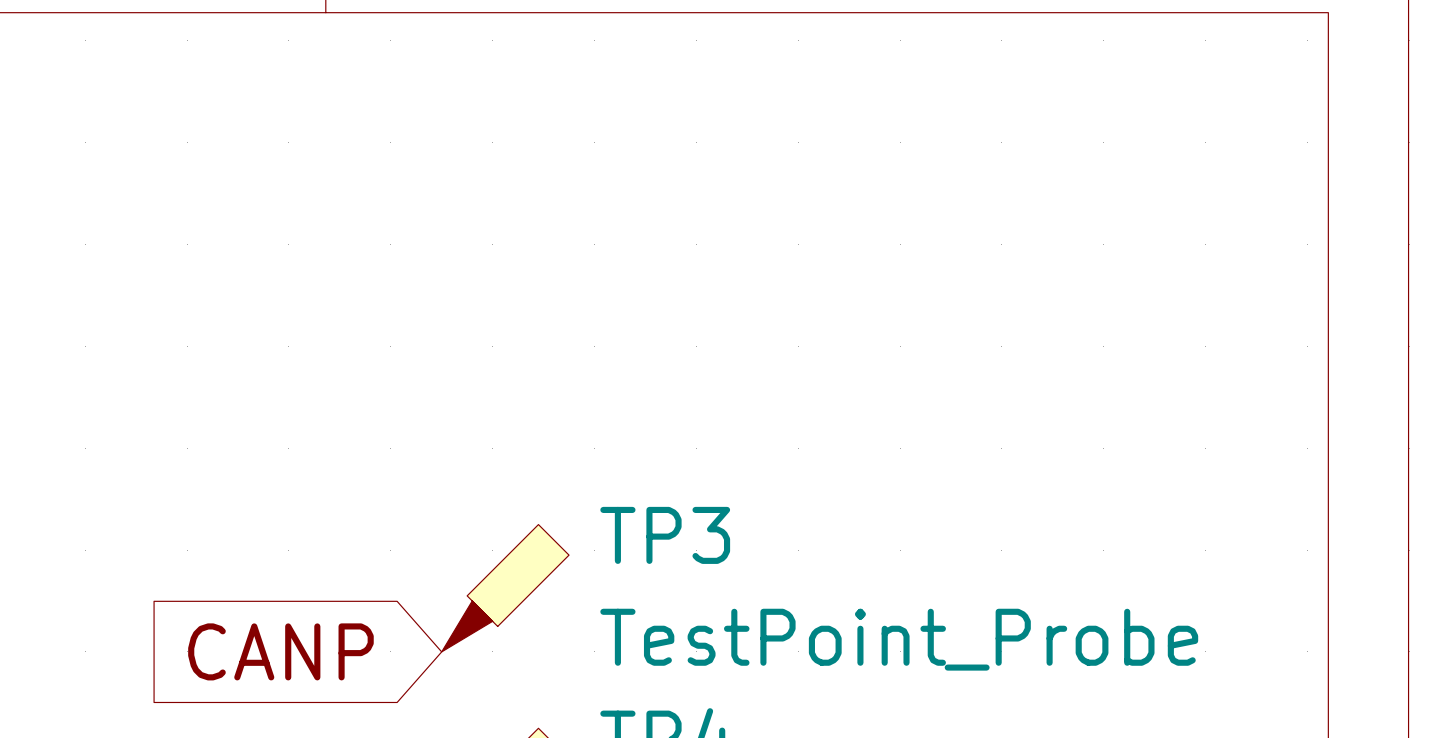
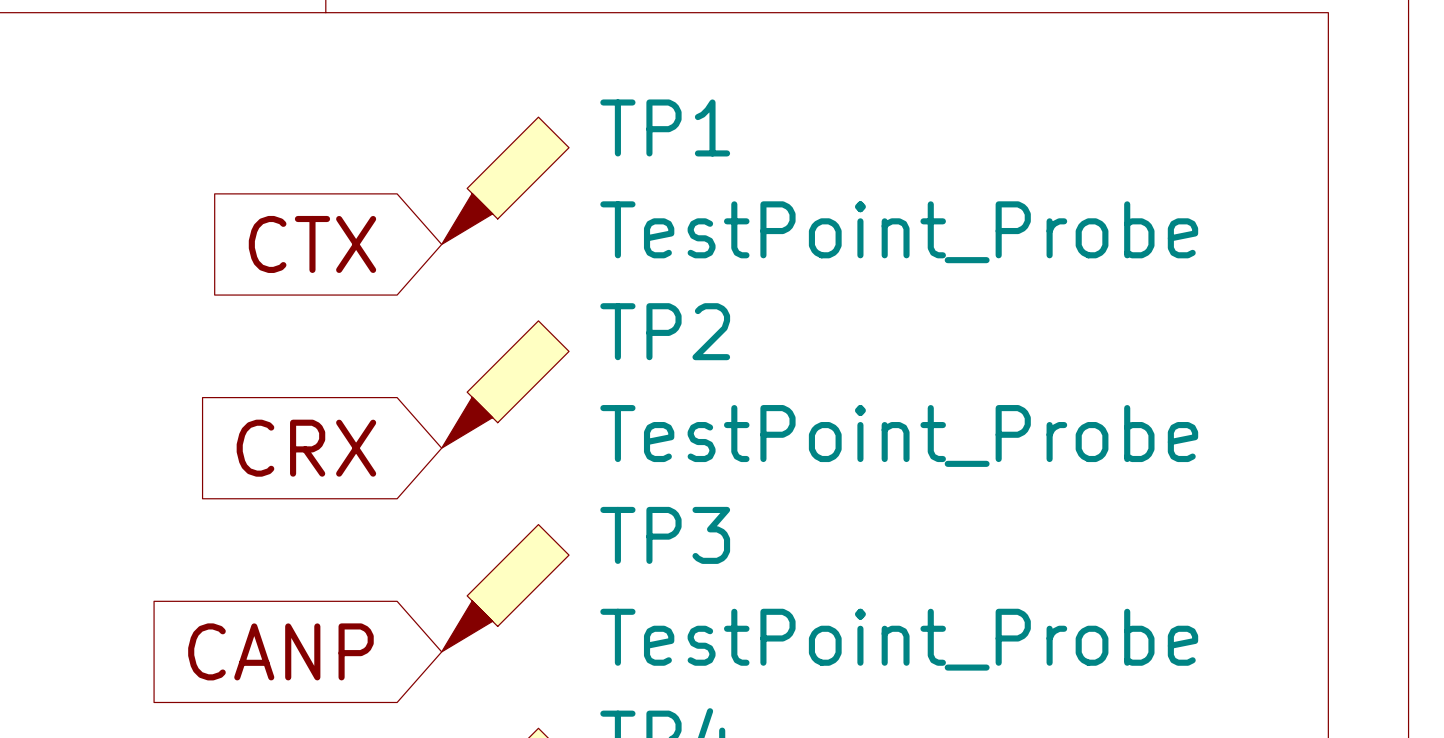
TP1: none -> TestPoint_Probe (505, 180)
global label: none -> CTX (312, 244)
TP2: none -> TestPoint_Probe (505, 384)
global label: none -> CRX (306, 448)

